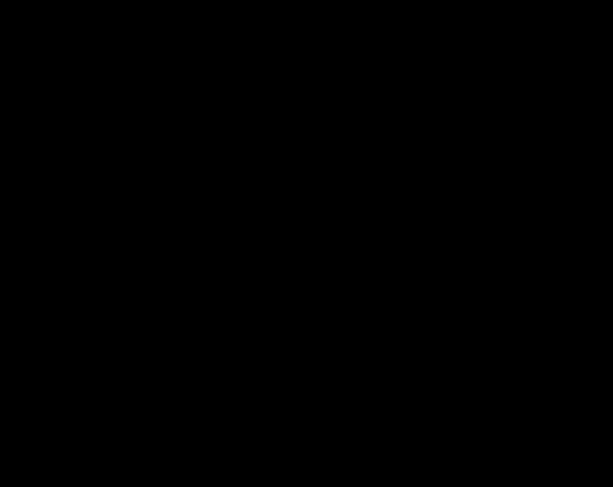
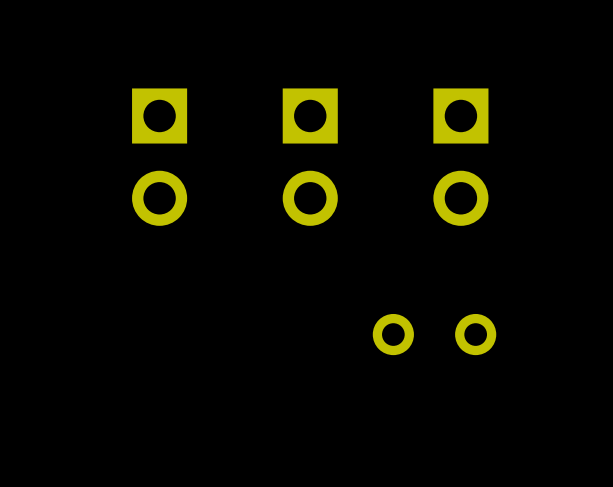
part: none -> (159, 157)
part: none -> (310, 157)
part: none -> (460, 157)
part: none -> (434, 334)

